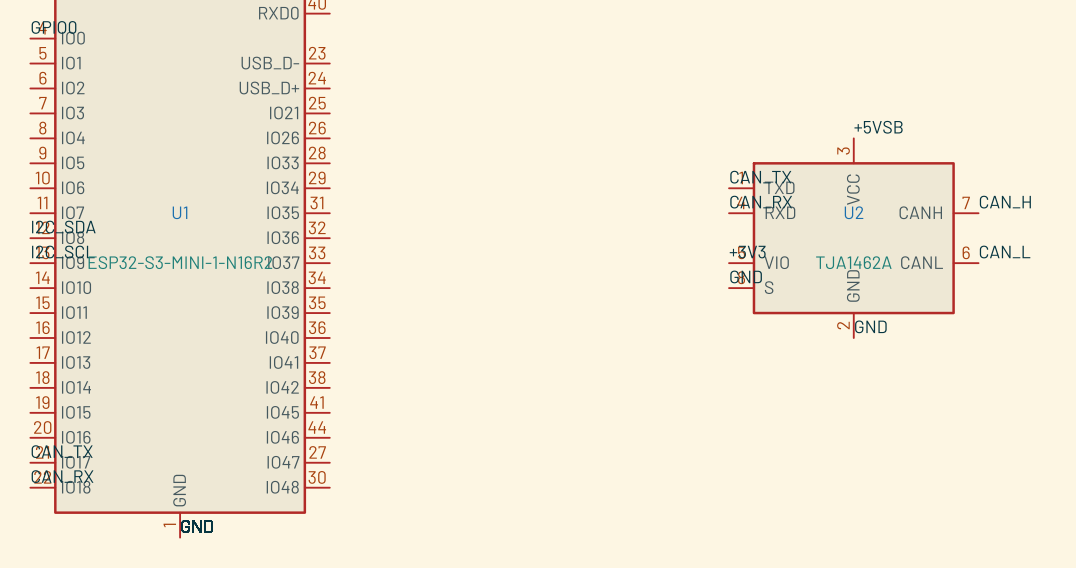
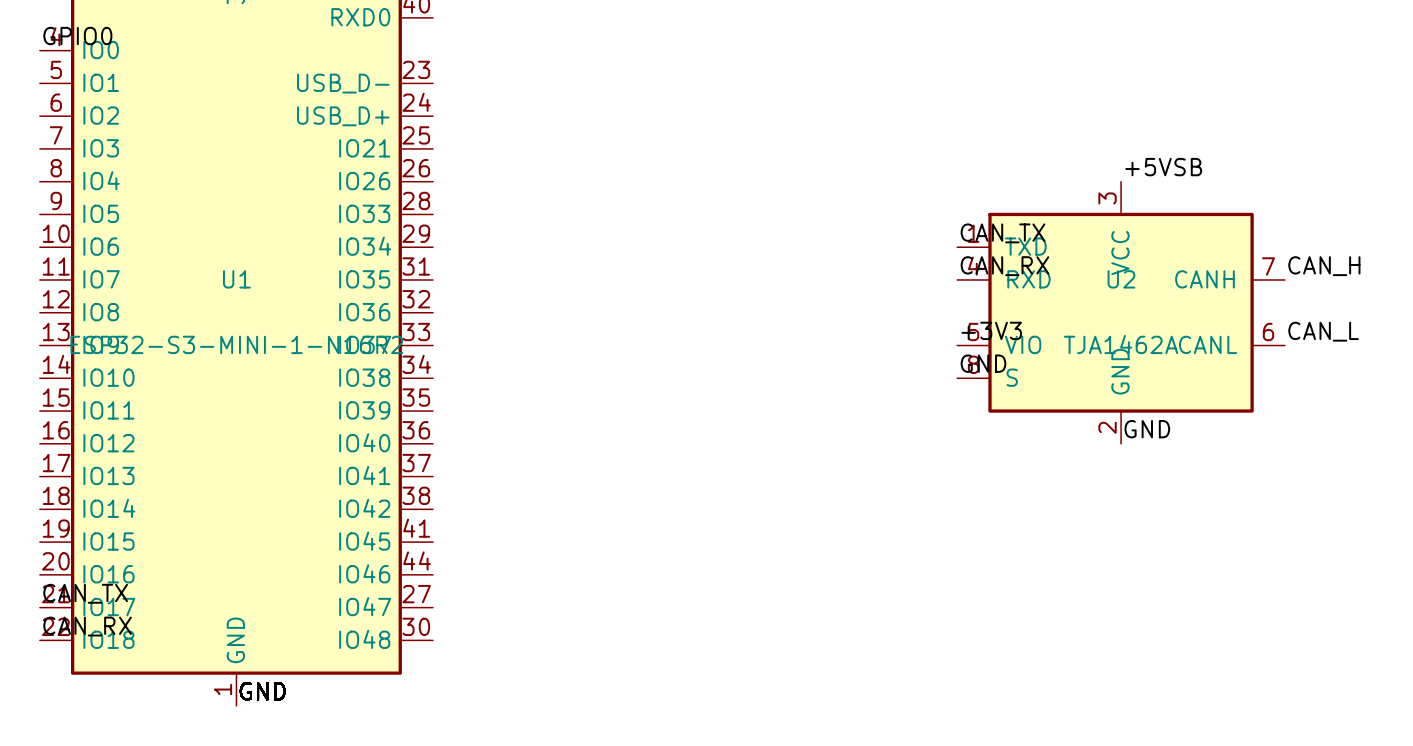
label: I2C_SDA (63, 227) -> none
label: I2C_SCL (63, 252) -> none

